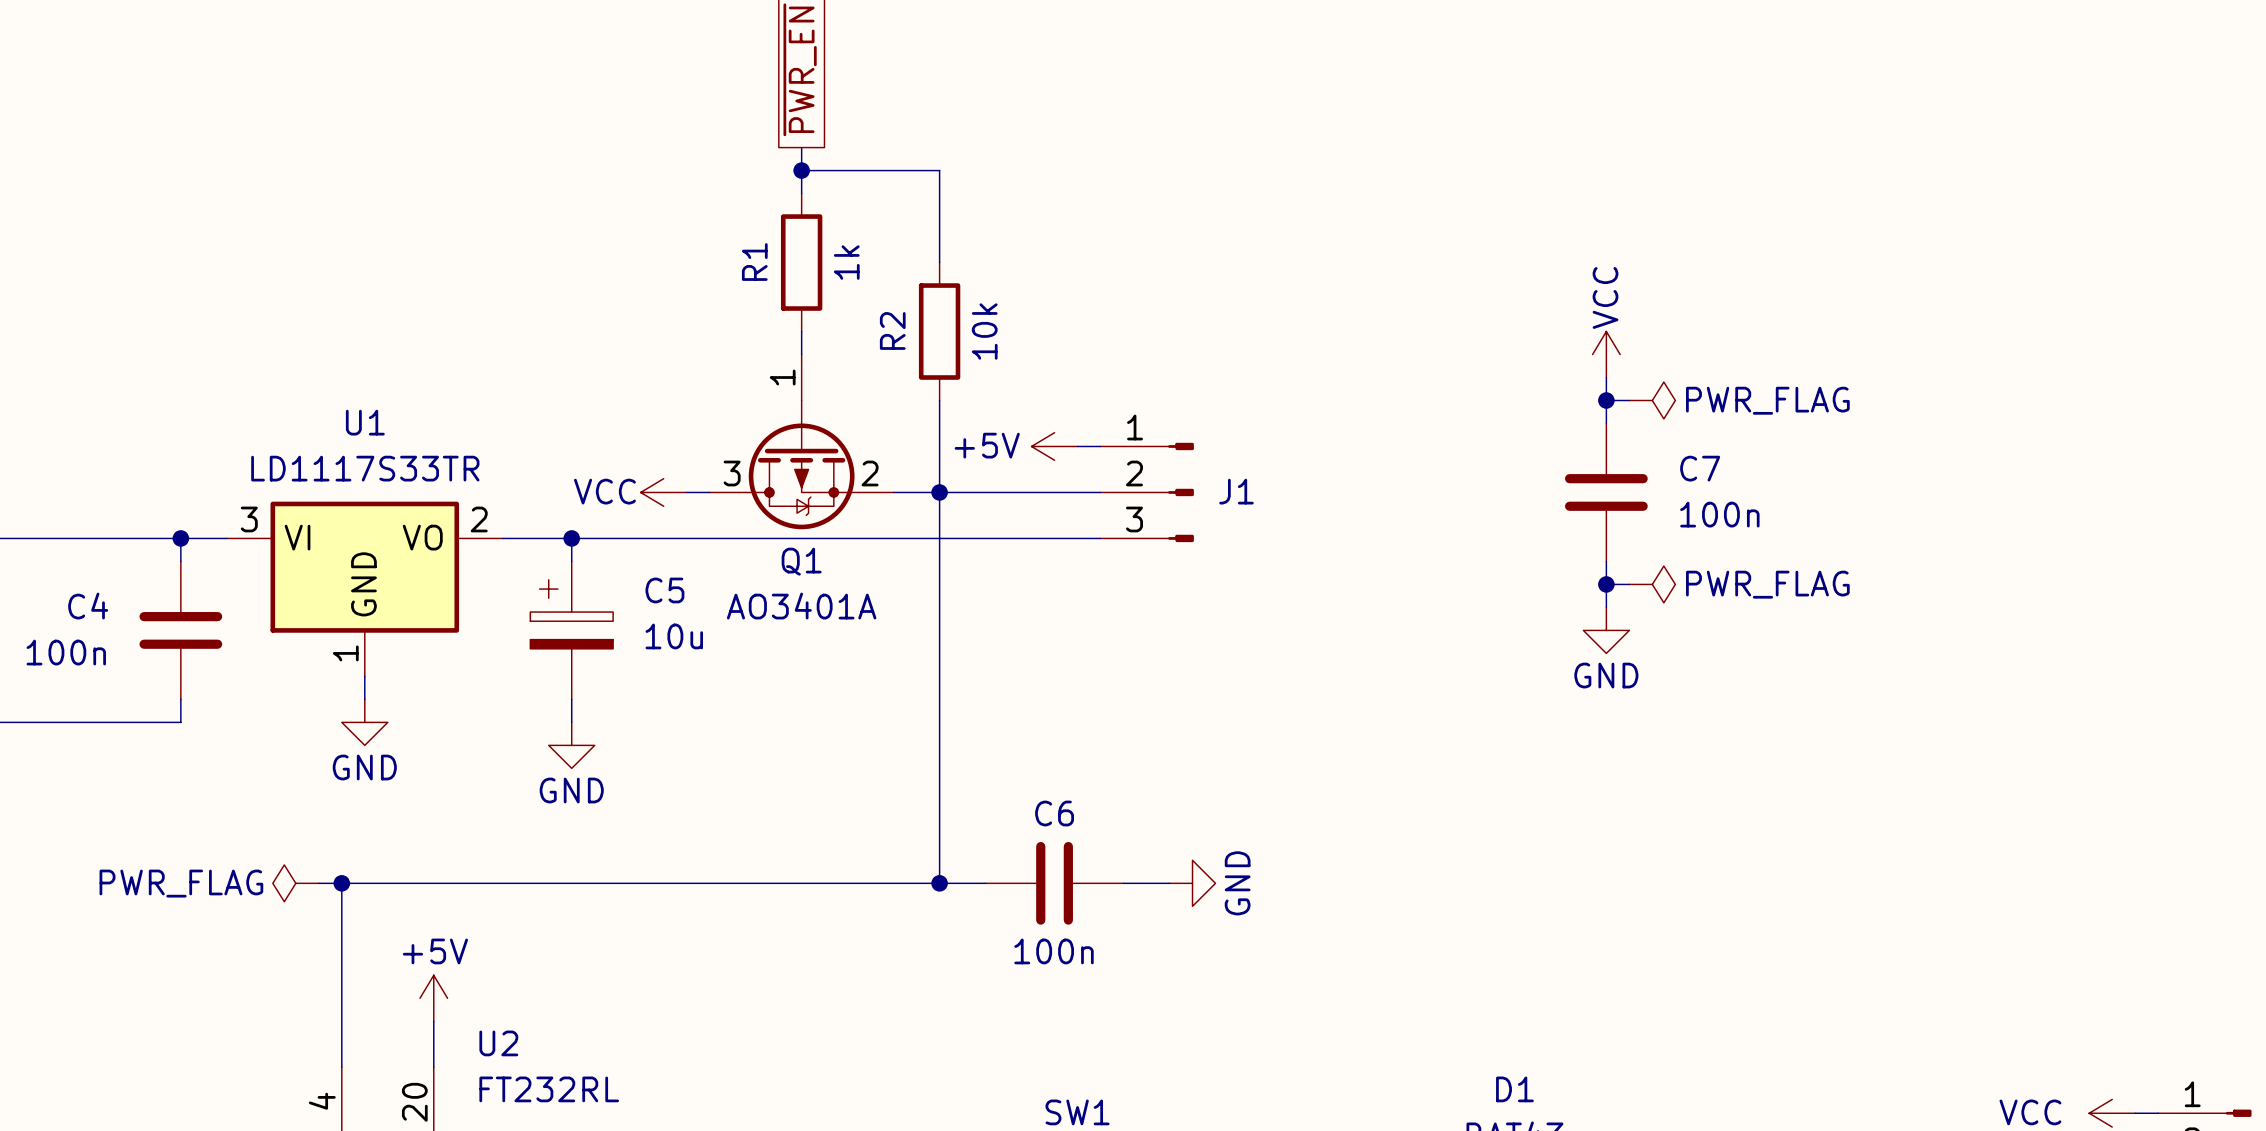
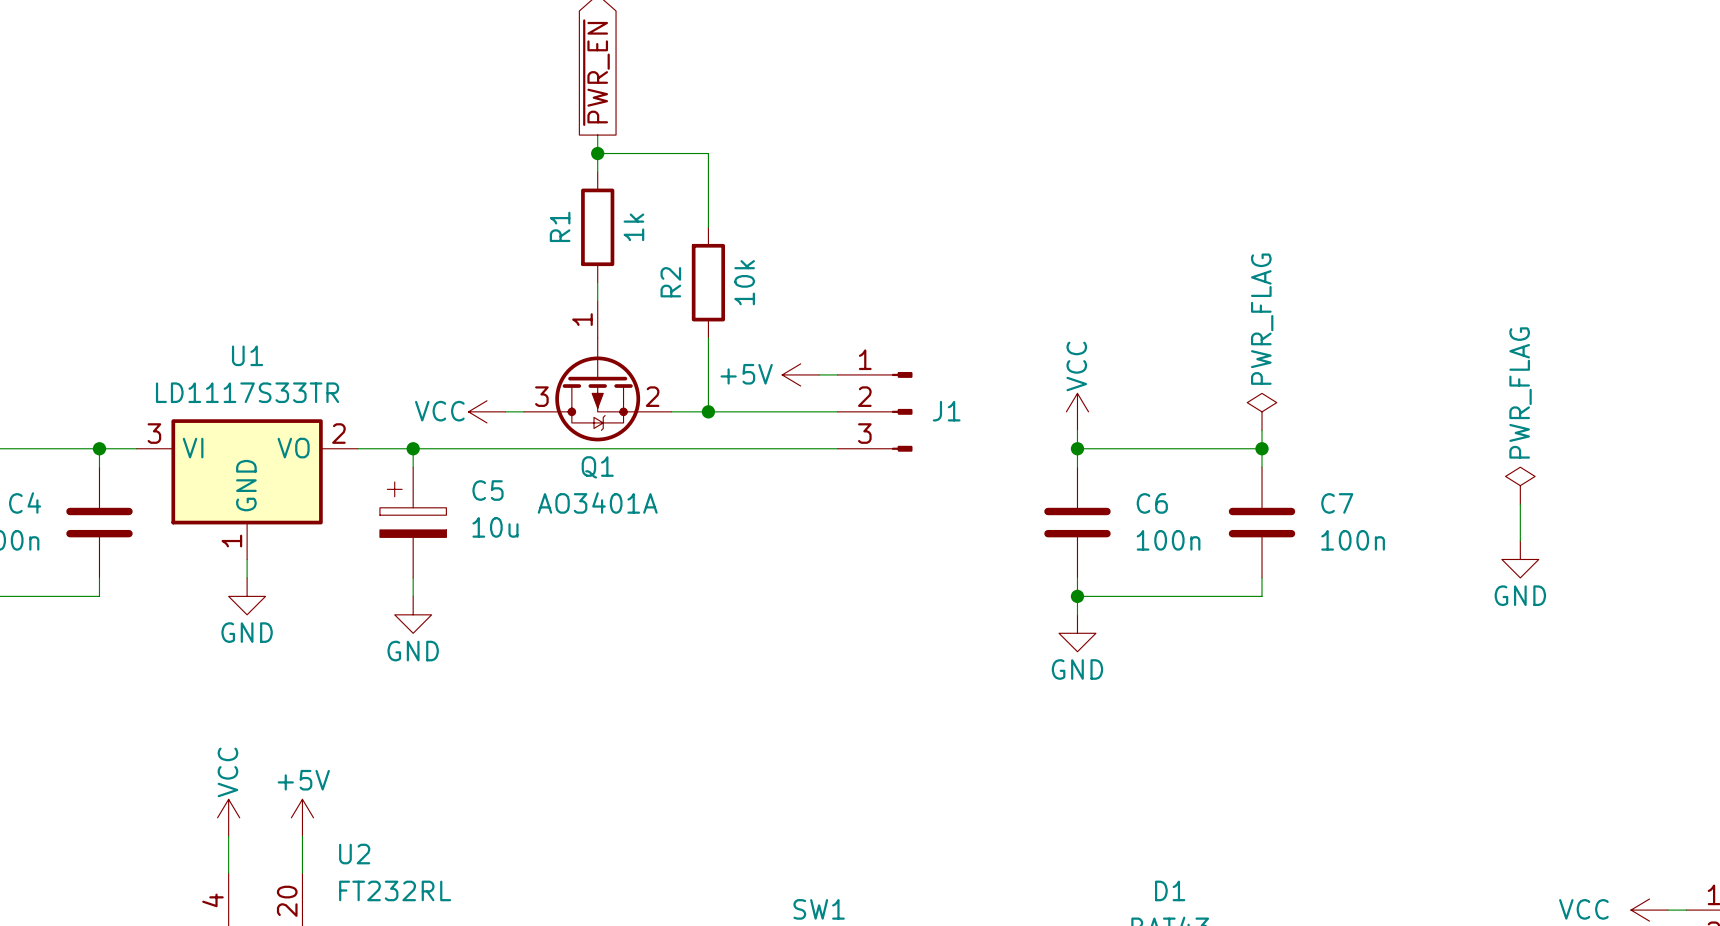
power symbol position: VCC (1606, 354) -> VCC (1077, 411)
wire: (1606, 377) (1606, 423) -> (1077, 430) (1077, 467)
wire: (1606, 400) (1629, 400) -> none
junction: (1606, 400) -> none
power symbol: PWR_FLAG (1652, 400) -> none
wire: (939, 492) (939, 883) -> none
C7 position: (1606, 492) -> (1262, 522)
power symbol: none -> PWR_FLAG (1262, 411)
wire: none -> (1262, 430) (1262, 467)
wire: none -> (1077, 448) (1262, 448)
junction: none -> (1077, 448)
wire: (1606, 561) (1606, 607) -> (1077, 577) (1077, 614)
wire: (1606, 584) (1629, 584) -> none
junction position: (1606, 584) -> (1262, 448)
power symbol: PWR_FLAG (1652, 584) -> none
power symbol: none -> PWR_FLAG (1520, 485)
wire: none -> (1520, 504) (1520, 541)
power symbol: GND (1606, 630) -> none
power symbol: none -> GND (1520, 559)
wire: none -> (1262, 577) (1262, 596) (1077, 596)
junction: none -> (1077, 596)
power symbol: none -> GND (1077, 633)
C6 name position: C6 (1054, 813) -> C6 (1152, 503)
power symbol: PWR_FLAG (295, 883) -> none
wire: (318, 883) (985, 883) -> none
wire: (341, 883) (341, 1021) -> none
junction: (341, 883) -> none
junction: (939, 883) -> none
C6 rotation: 0° (1054, 883) -> 90° clockwise (1077, 522)
C6 position: (1054, 883) -> (1077, 522)
wire: (1123, 883) (1169, 883) -> none
power symbol: GND (1192, 883) -> none
C6 value position: 100n (1054, 951) -> 100n (1168, 540)
power symbol: none -> VCC (228, 817)

